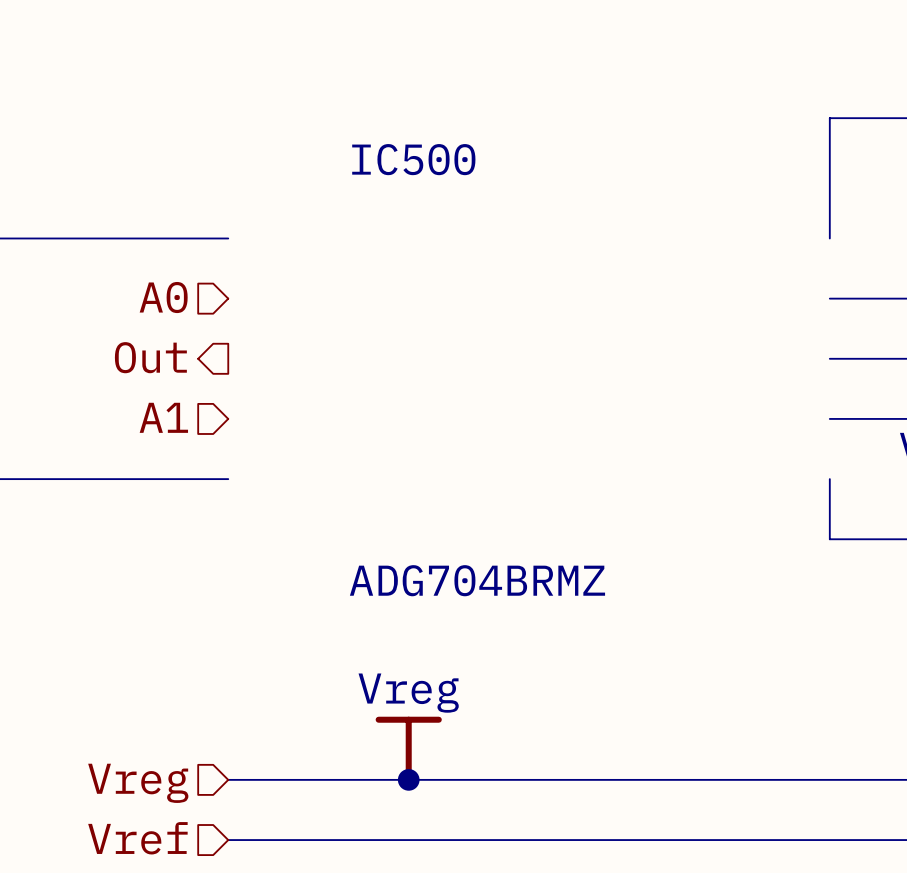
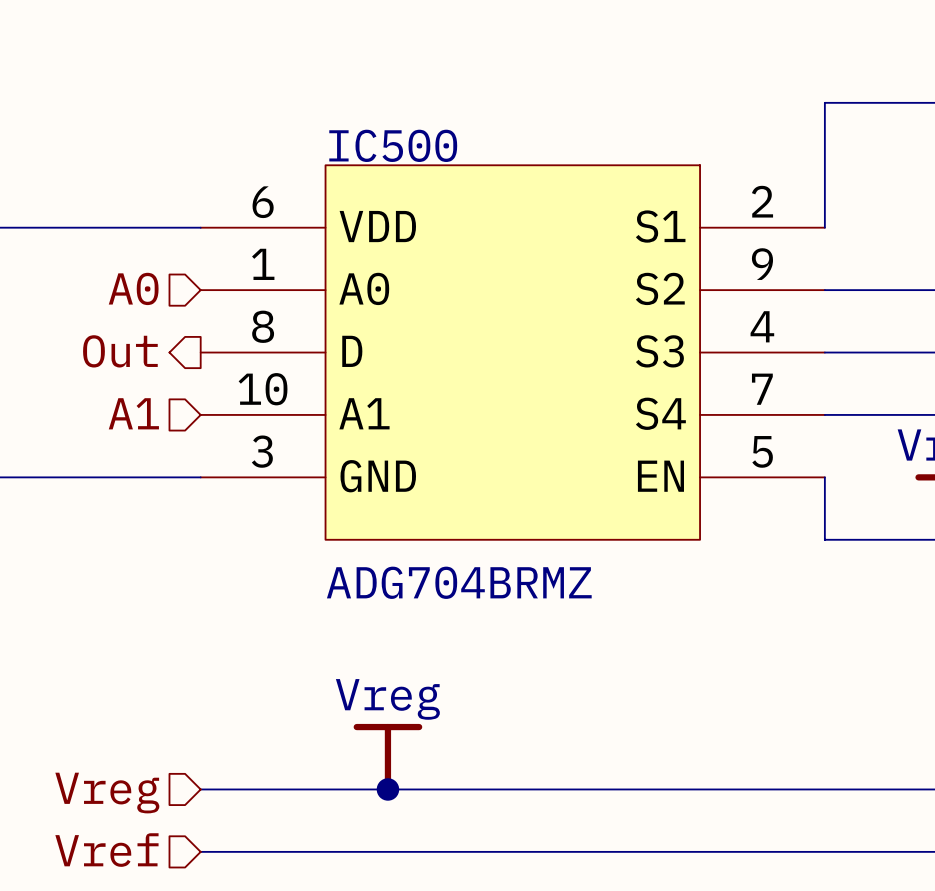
IC500 symbol: [349, 144, 606, 597] -> [200, 165, 825, 540]

